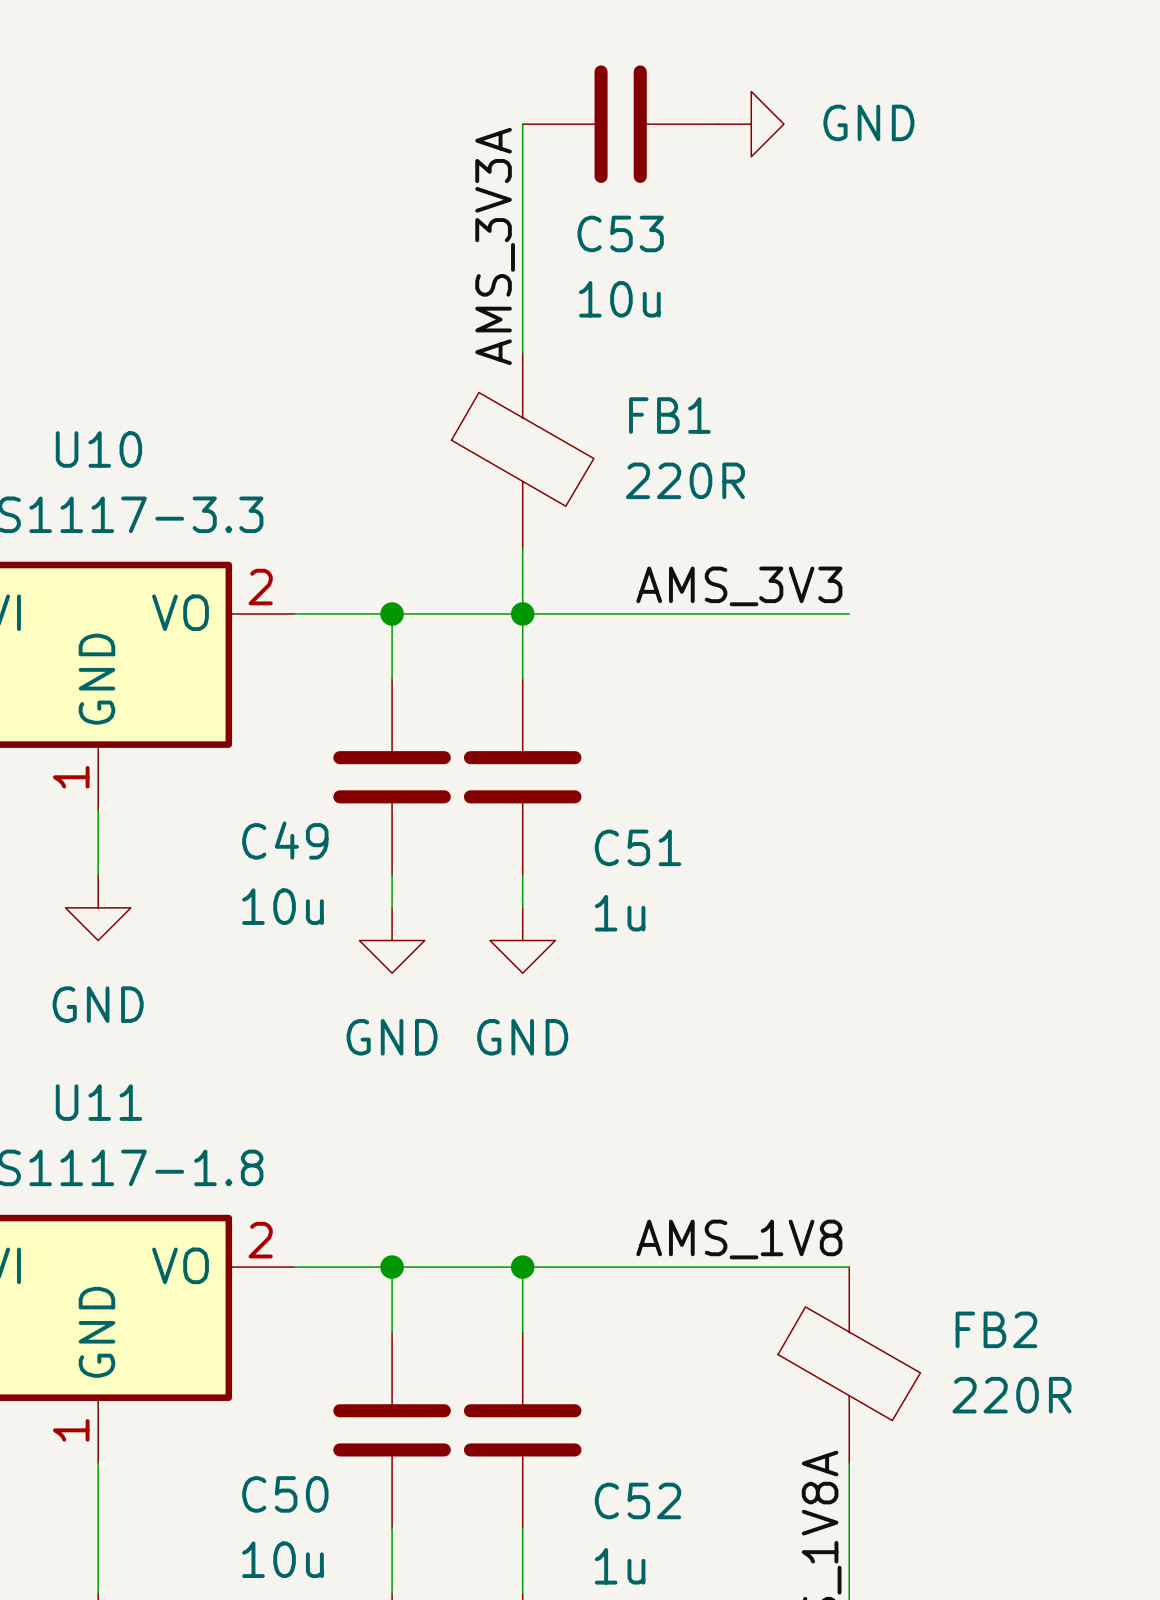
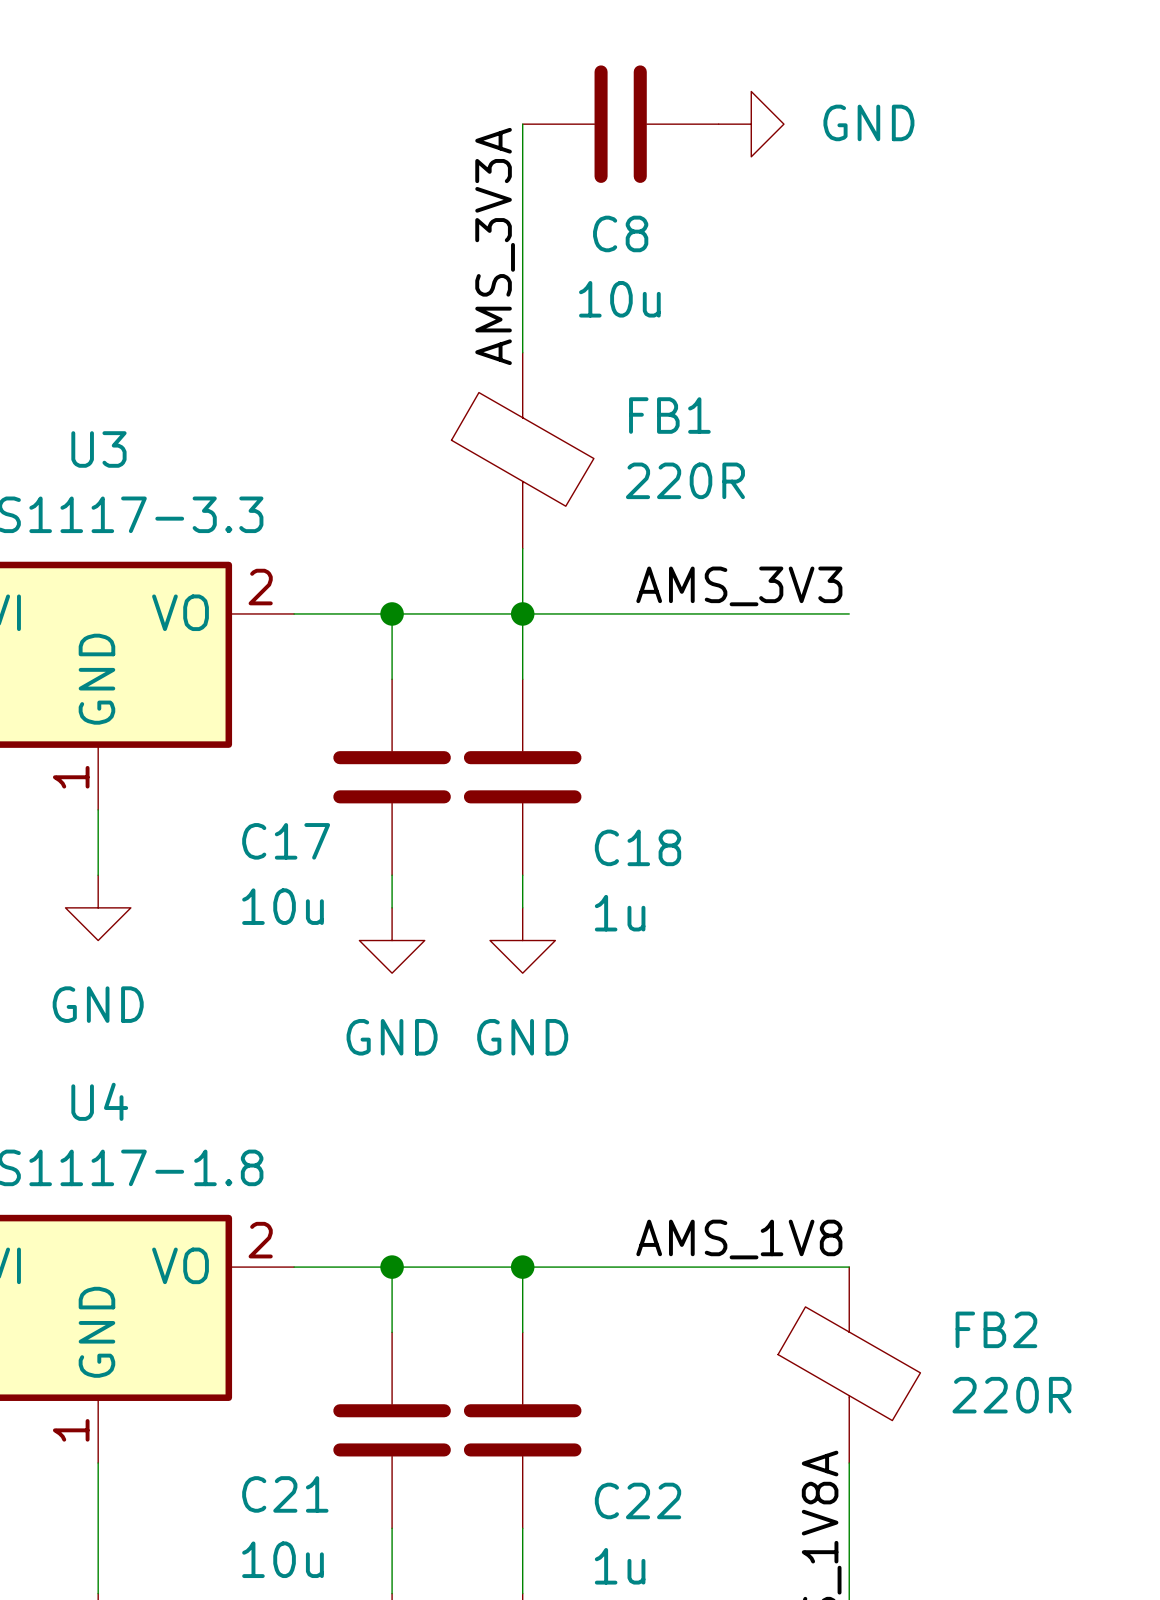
C53 name: C53 (620, 233) -> C8 (620, 233)
U10 name: U10 (98, 449) -> U3 (98, 449)
C49 name: C49 (285, 840) -> C17 (286, 841)
C51 name: C51 (638, 847) -> C18 (638, 847)
U11 name: U11 (98, 1102) -> U4 (99, 1101)
C50 name: C50 (285, 1494) -> C21 (285, 1494)
C52 name: C52 (638, 1500) -> C22 (638, 1500)

